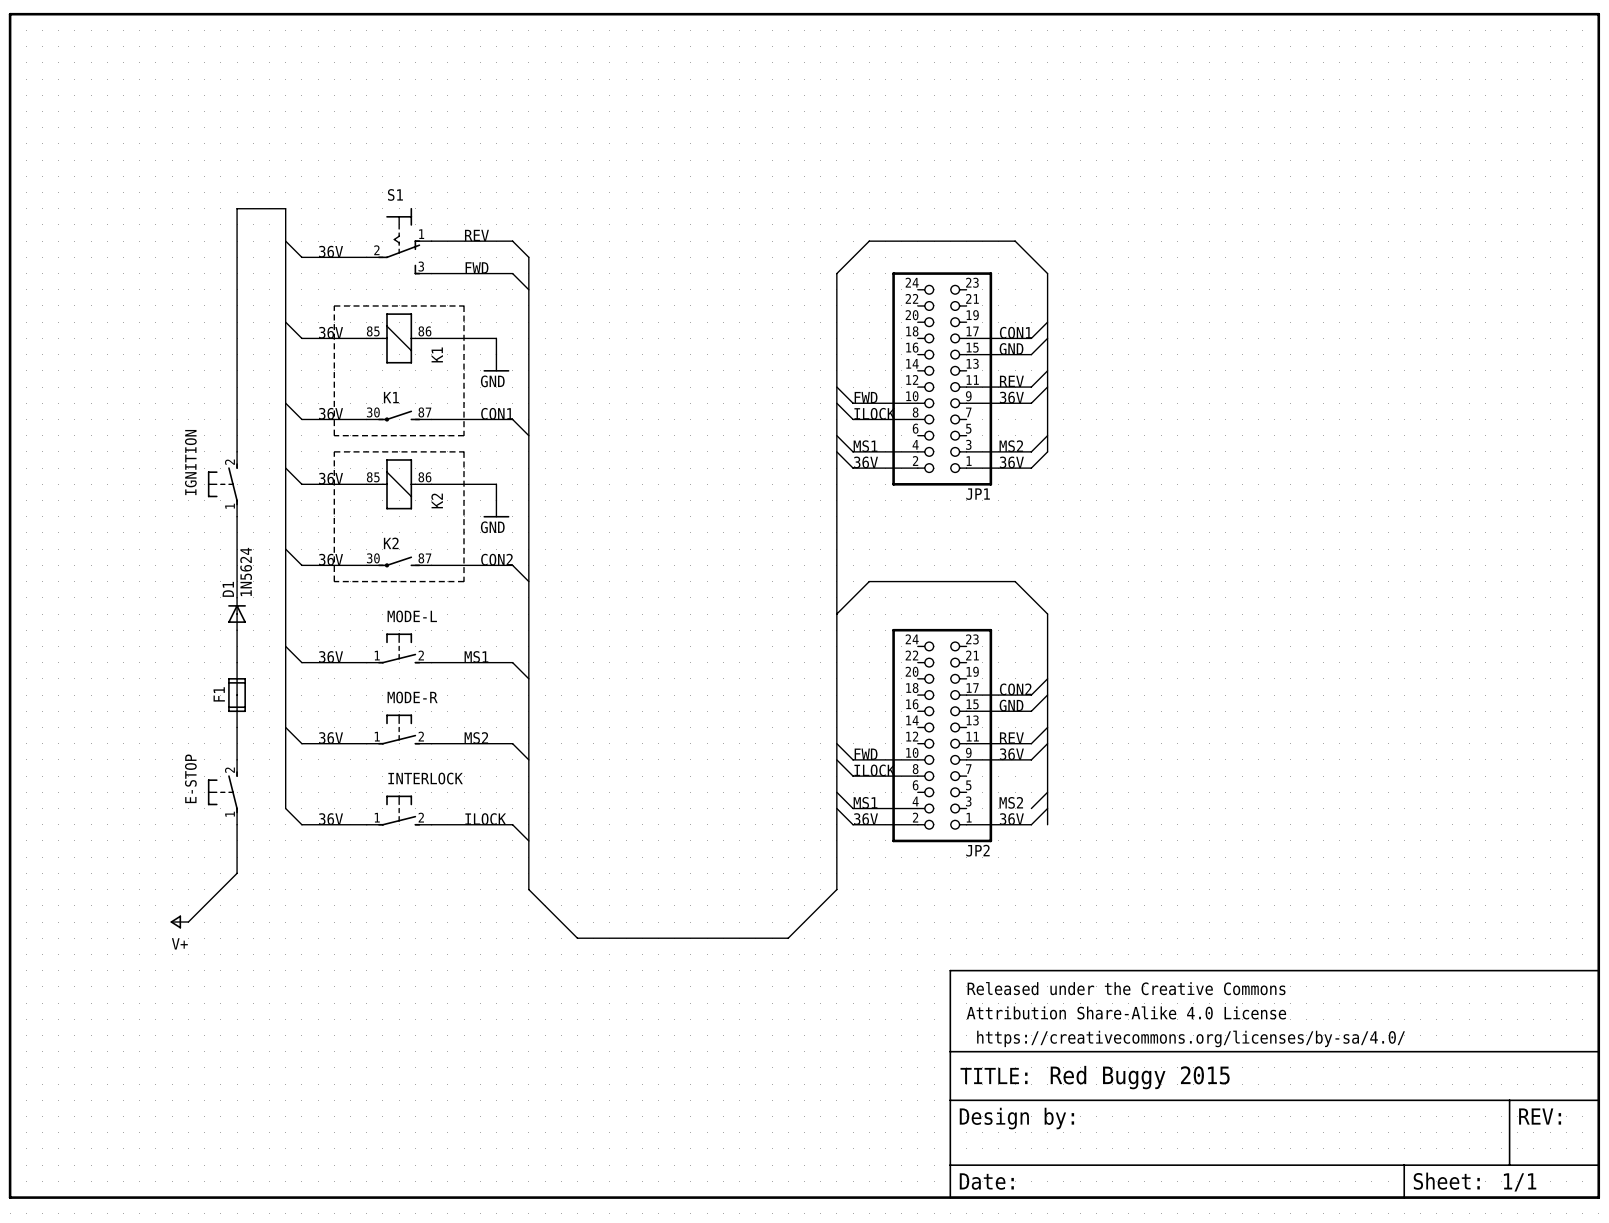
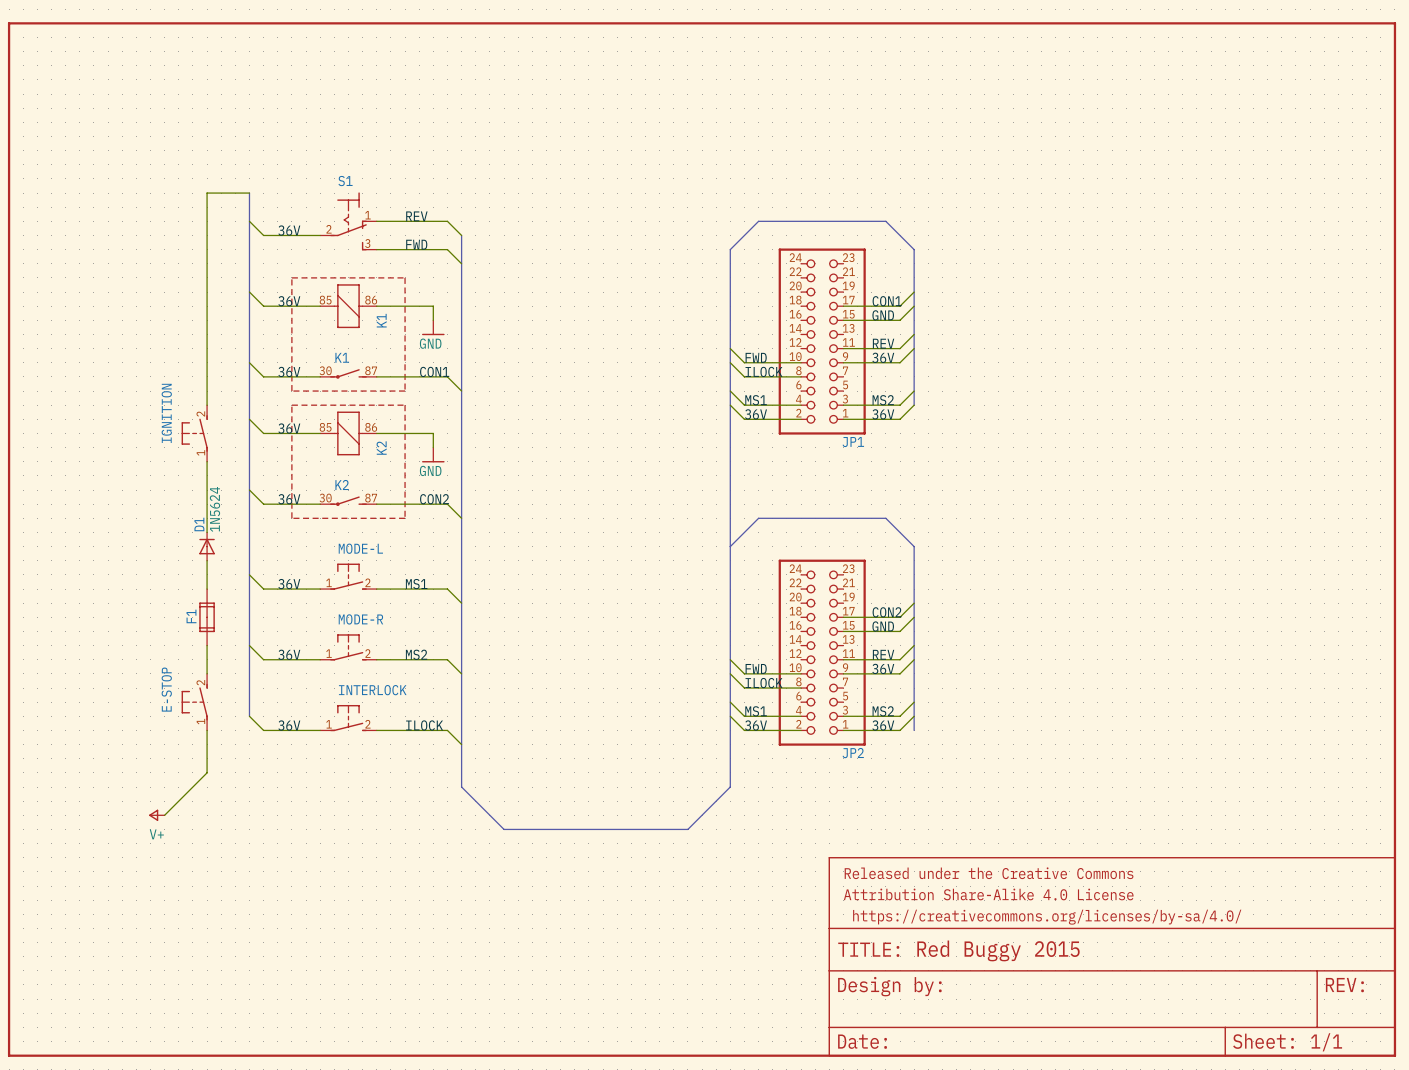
wire: none -> (843, 716) (900, 716)

